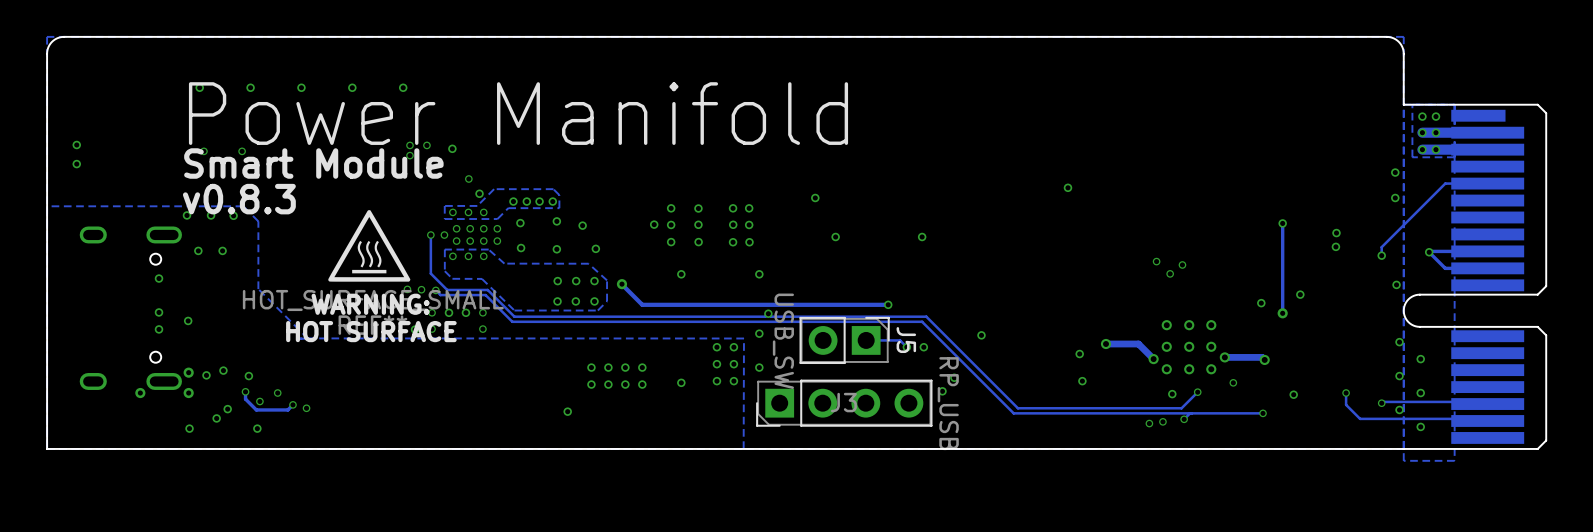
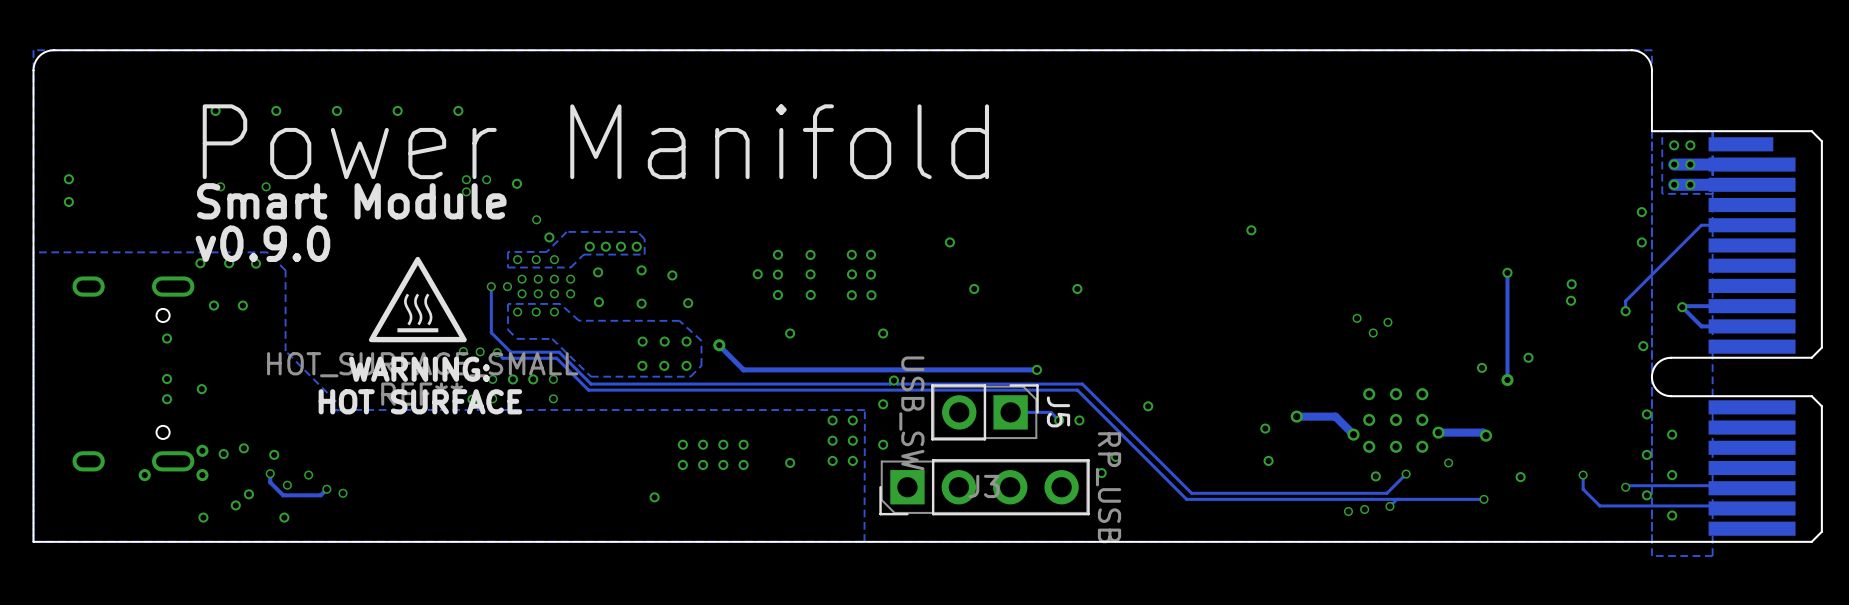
text: v0.8.3 (239, 199) -> v0.9.0 (262, 243)

